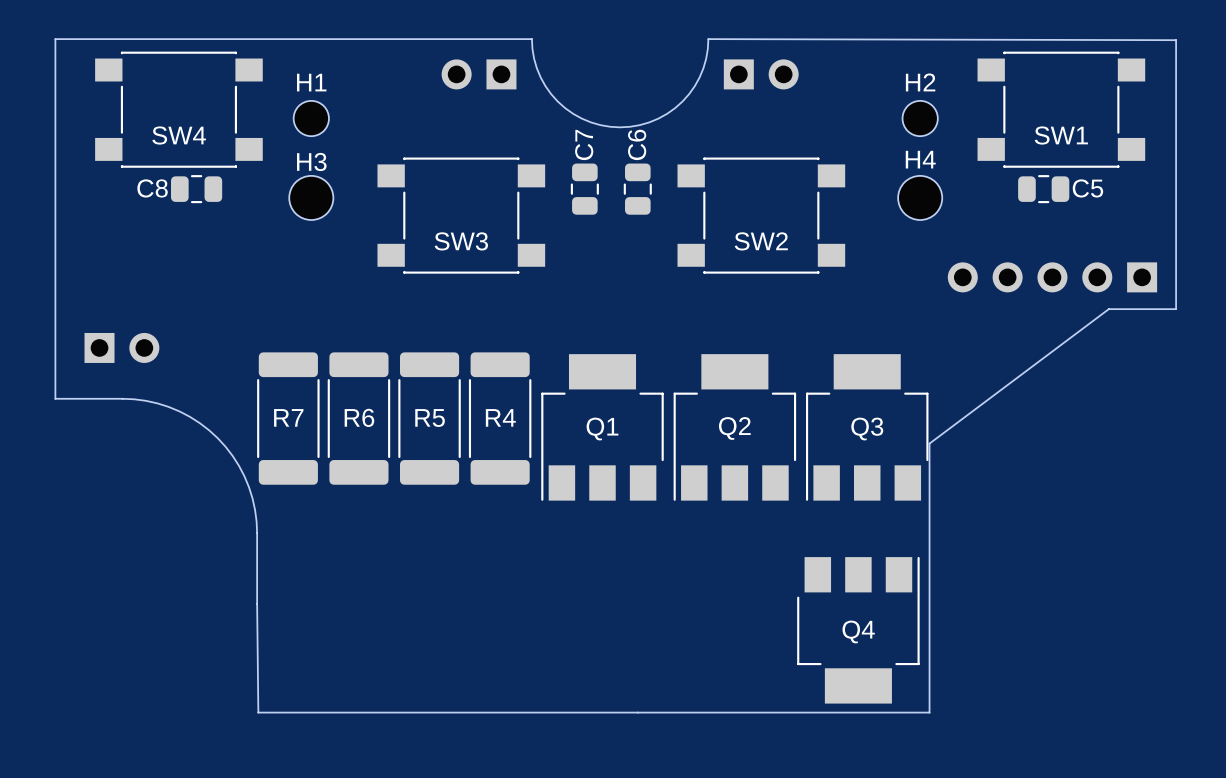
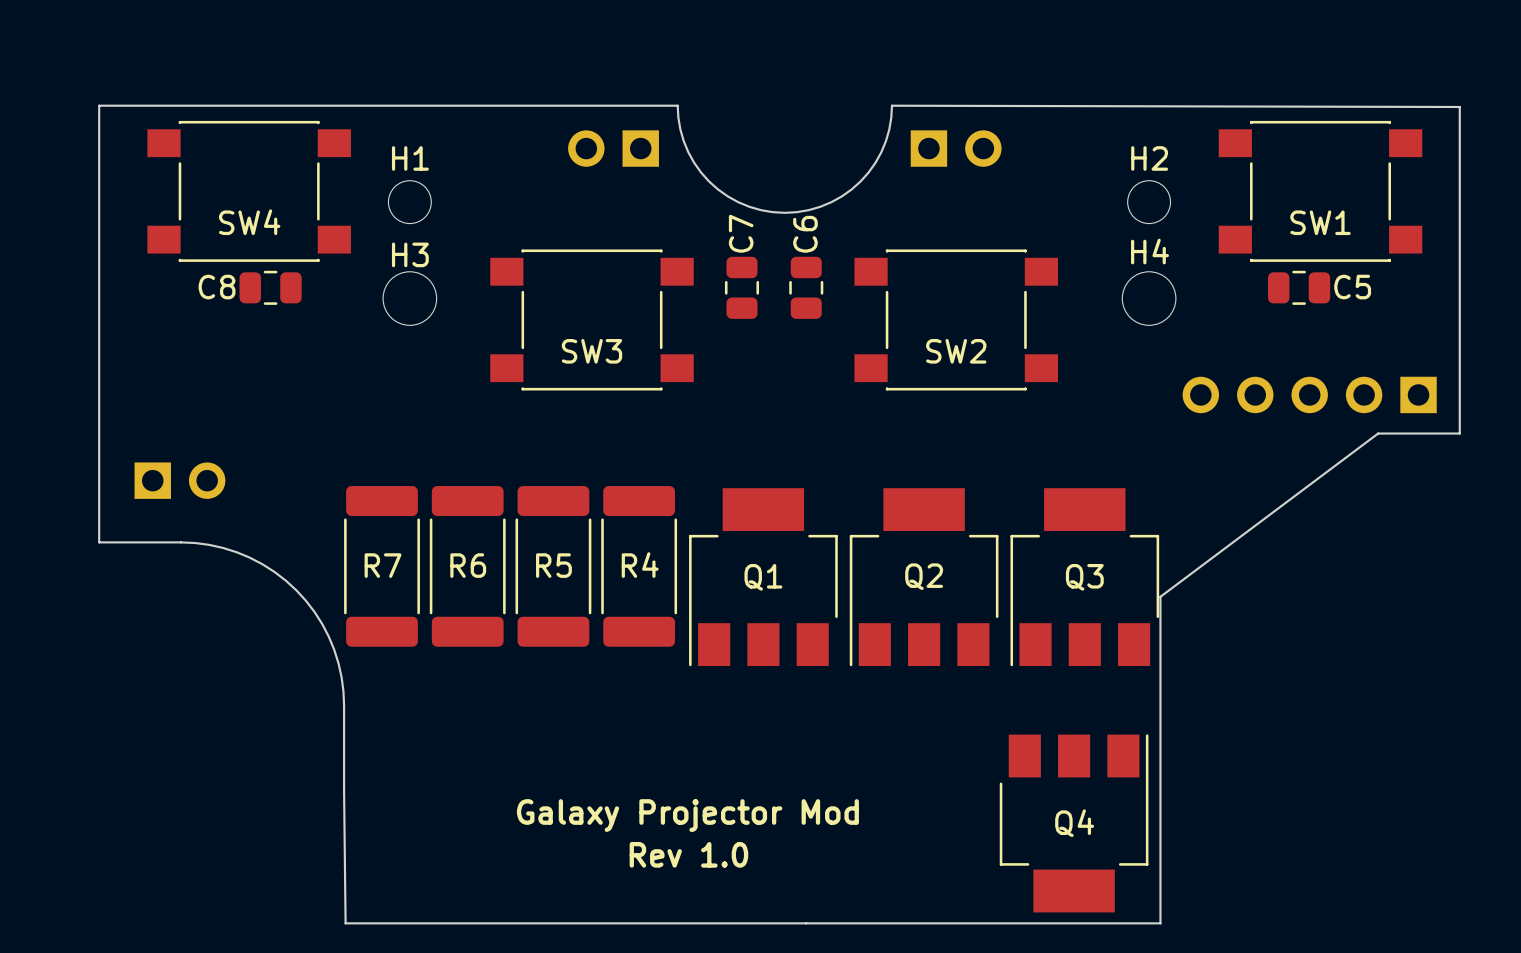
text: none -> Galaxy Projector Mod (687, 815)
text: none -> Rev 1.0 (688, 854)

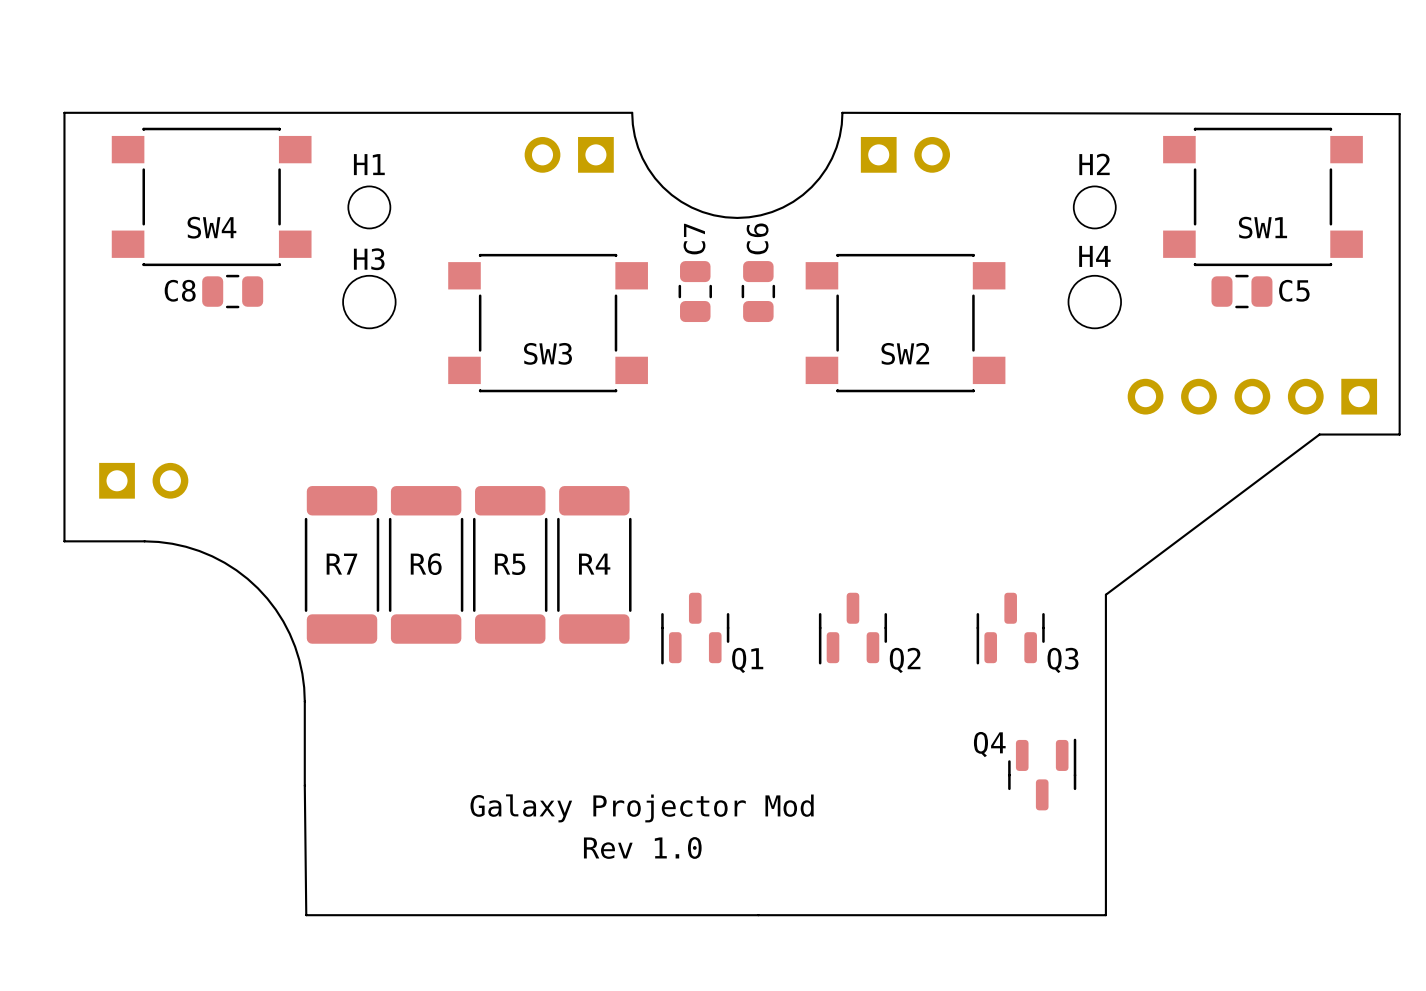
Q1 footprint: [689, 488, 838, 667] -> [661, 592, 730, 665]
Q2 footprint: [849, 488, 999, 667] -> [818, 592, 888, 665]
Q3 footprint: [1010, 488, 1160, 667] -> [976, 592, 1045, 665]
Q2 name position: Q2 (924, 576) -> Q2 (905, 660)
Q1 name position: Q1 (763, 577) -> Q1 (747, 660)
Q3 name position: Q3 (1084, 577) -> Q3 (1062, 660)
Q4 footprint: [999, 734, 1149, 913] -> [1008, 738, 1077, 811]
Q4 name position: Q4 (1074, 823) -> Q4 (989, 744)

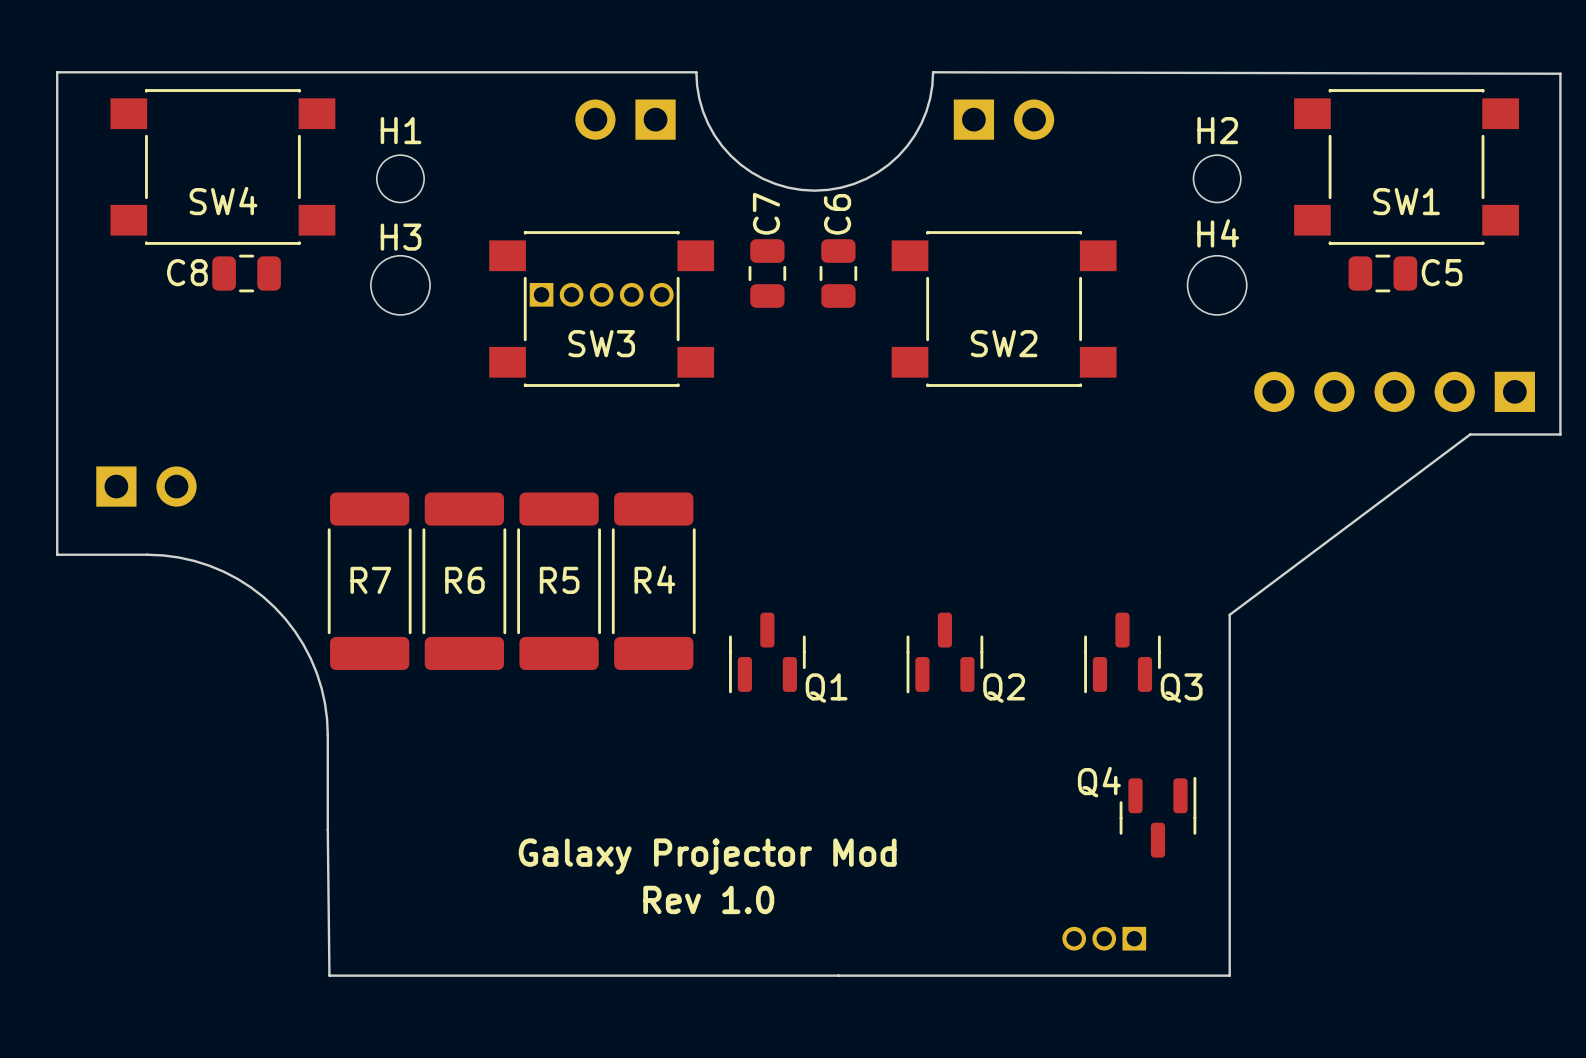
part: none -> (601, 294)
part: none -> (1104, 938)

